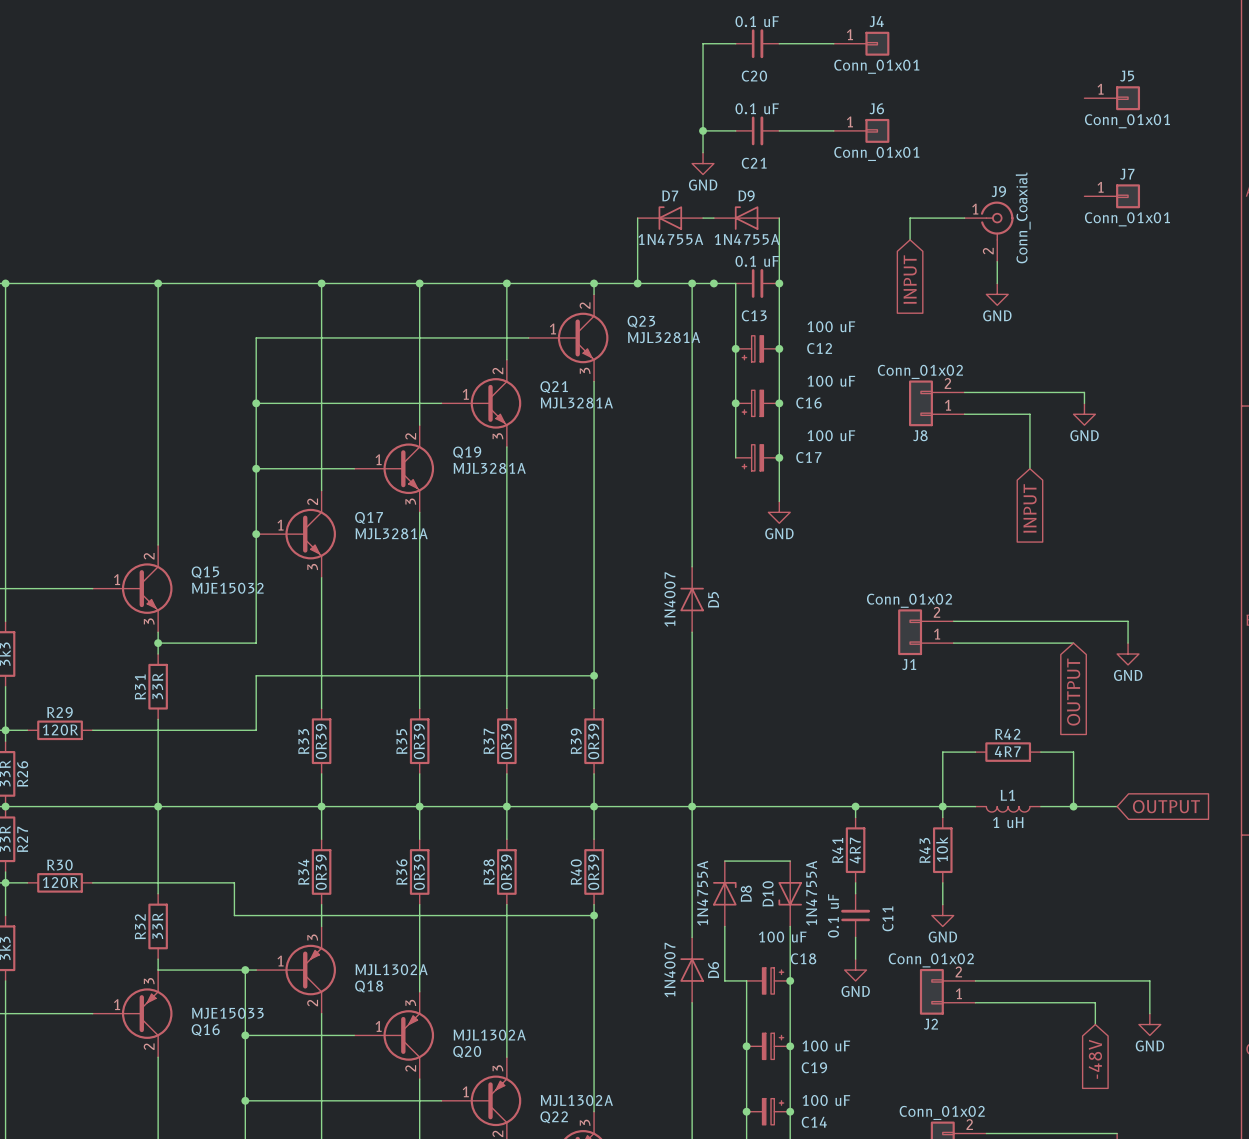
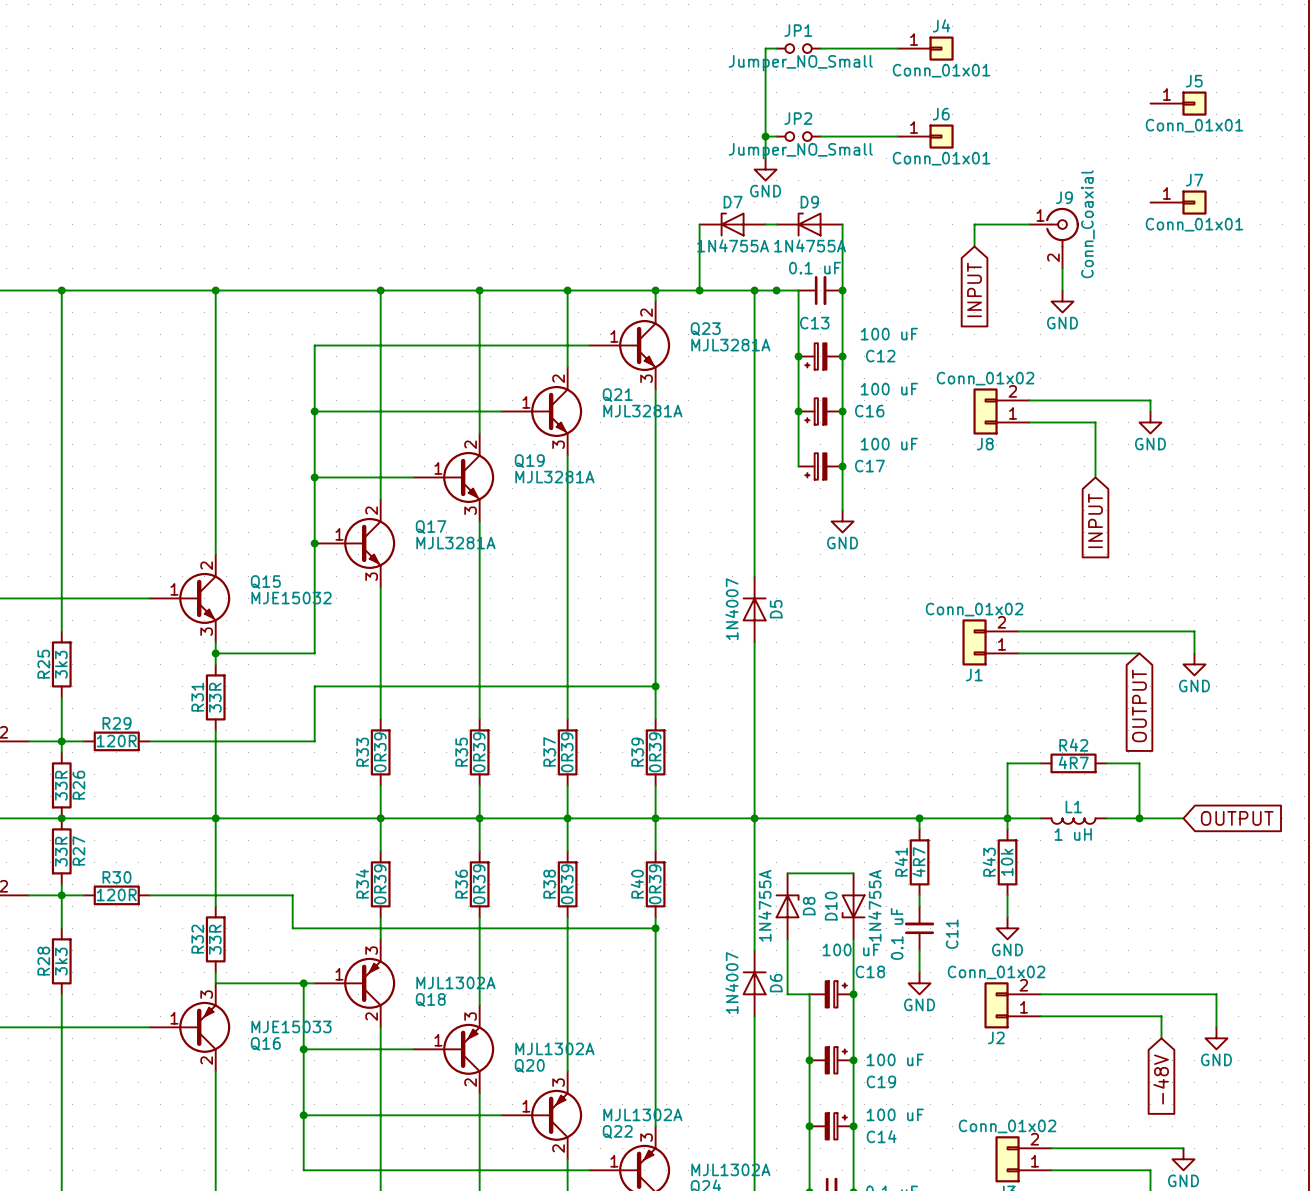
JP1: none -> Jumper_NO_Small (798, 48)
C20: 0.1 uF (757, 43) -> none
JP2: none -> Jumper_NO_Small (798, 136)
C21: 0.1 uF (757, 130) -> none

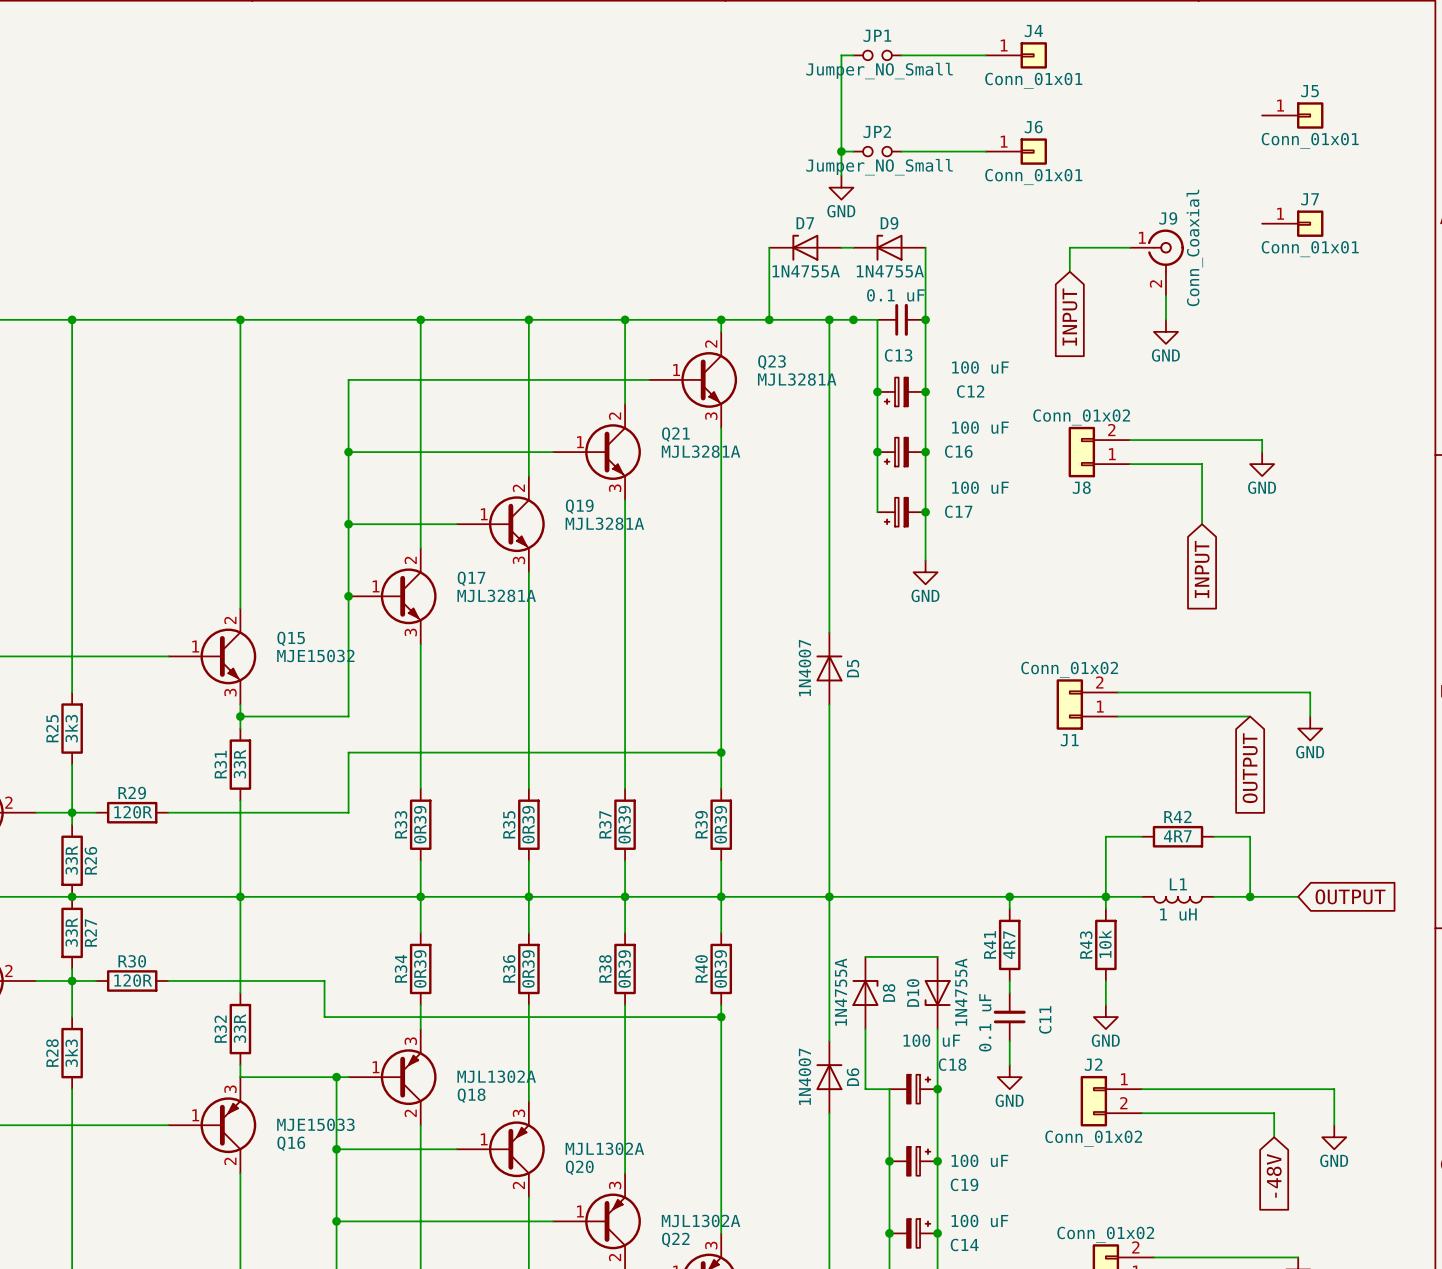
J2 flip: as is (996, 1005) -> up-down (1093, 1101)

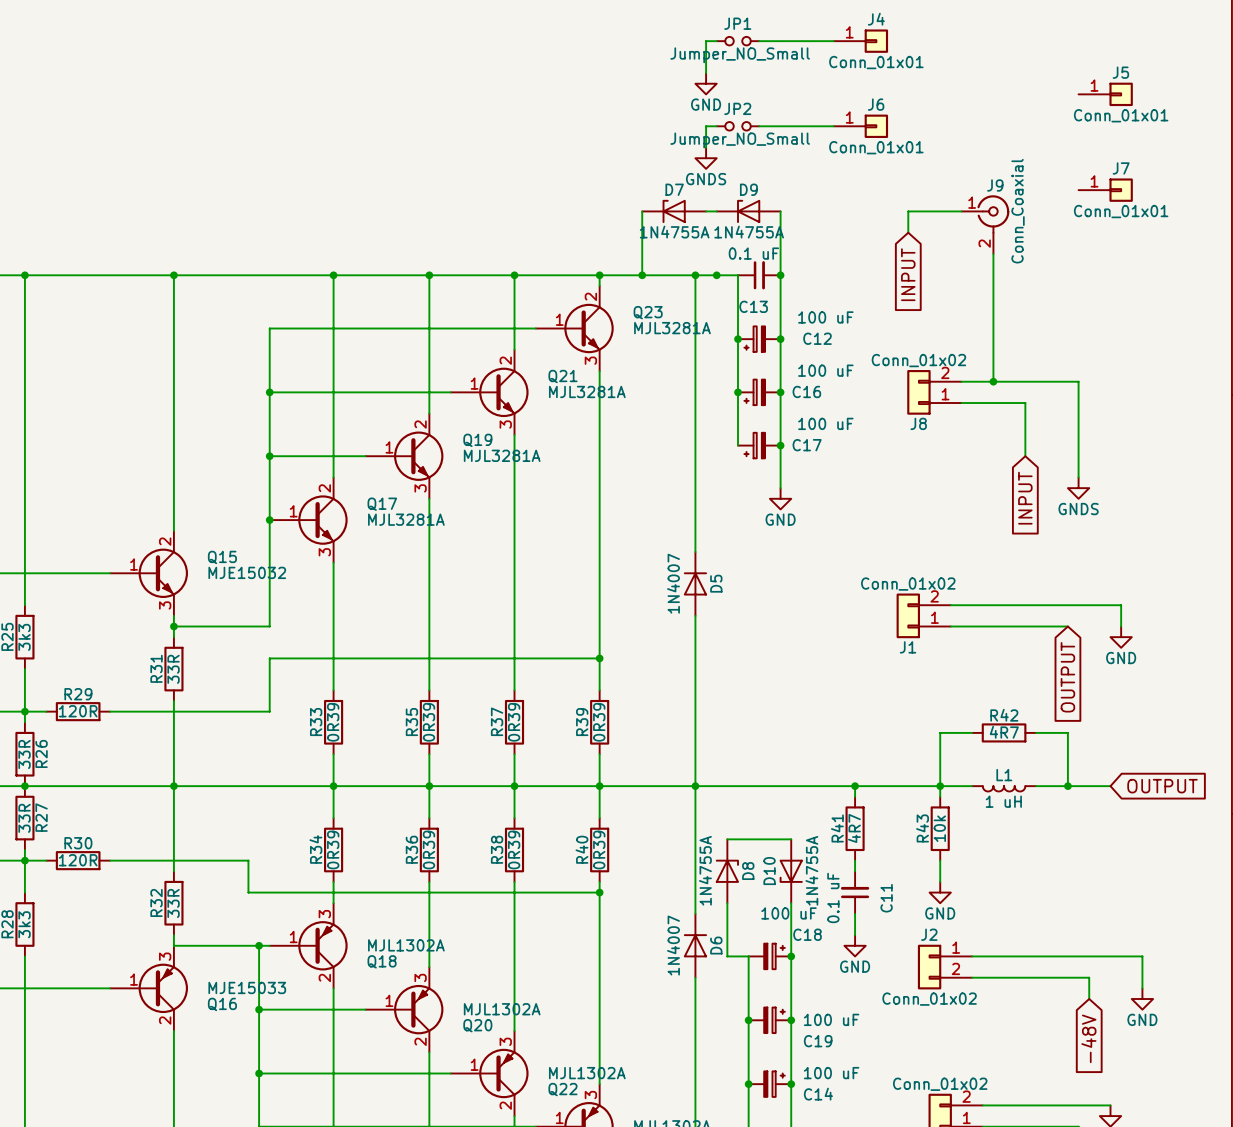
wire: (841, 91) (841, 151) -> none
power symbol: none -> GND (706, 83)
junction: (841, 151) -> none
power symbol: GND (841, 187) -> GNDS (706, 158)
wire: none -> (993, 275) (993, 381)
power symbol: GND (1165, 331) -> none
junction: none -> (993, 381)
wire: none -> (1078, 392) (1078, 477)
power symbol: GND (1262, 464) -> none
power symbol: none -> GNDS (1078, 488)

